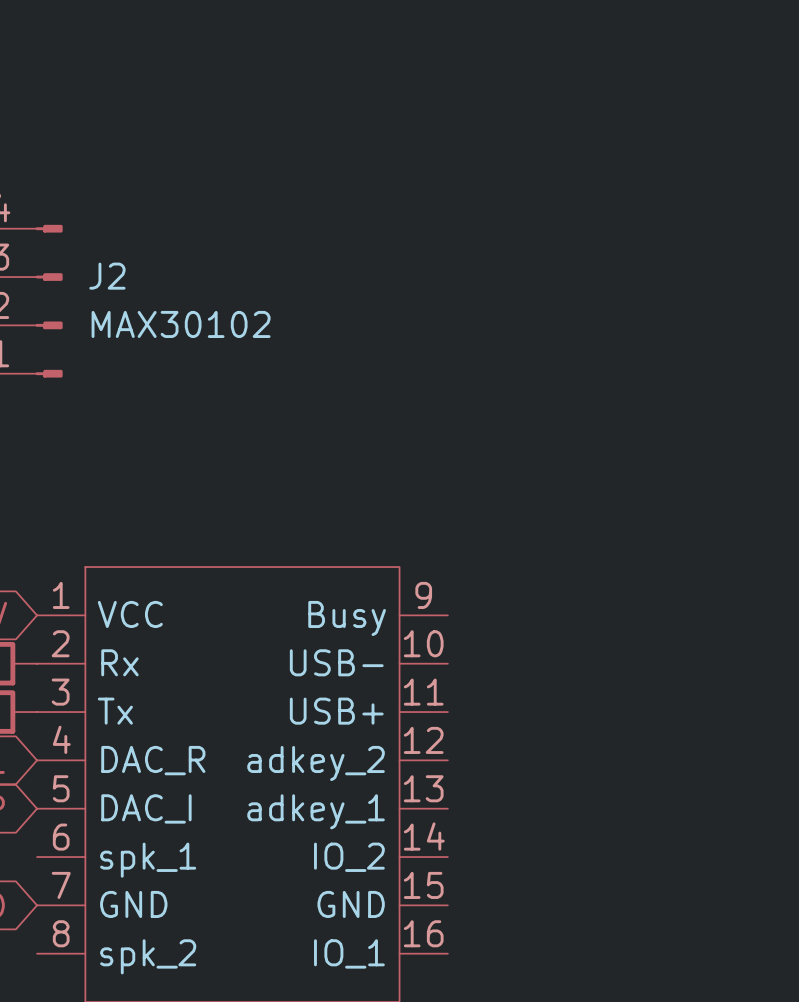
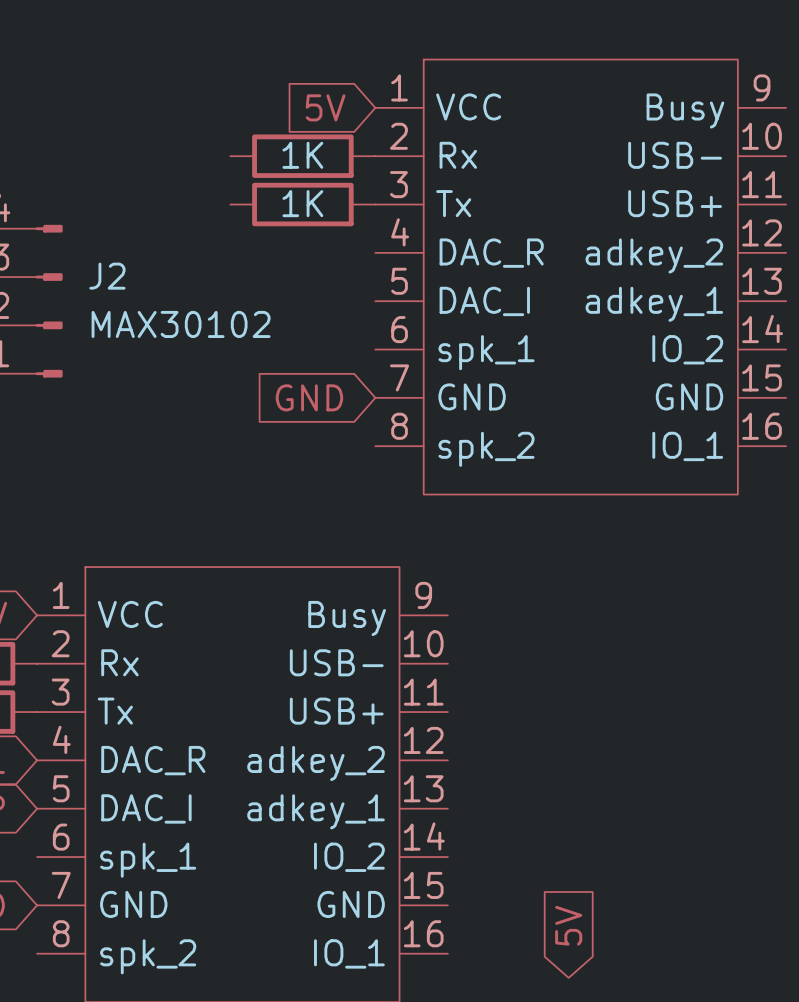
global label: none -> 5V (325, 107)
part: none -> 1K (302, 156)
part: none -> 1K (302, 204)
part: none -> (580, 277)
global label: none -> GND (309, 397)
global label: none -> 5V (568, 925)

